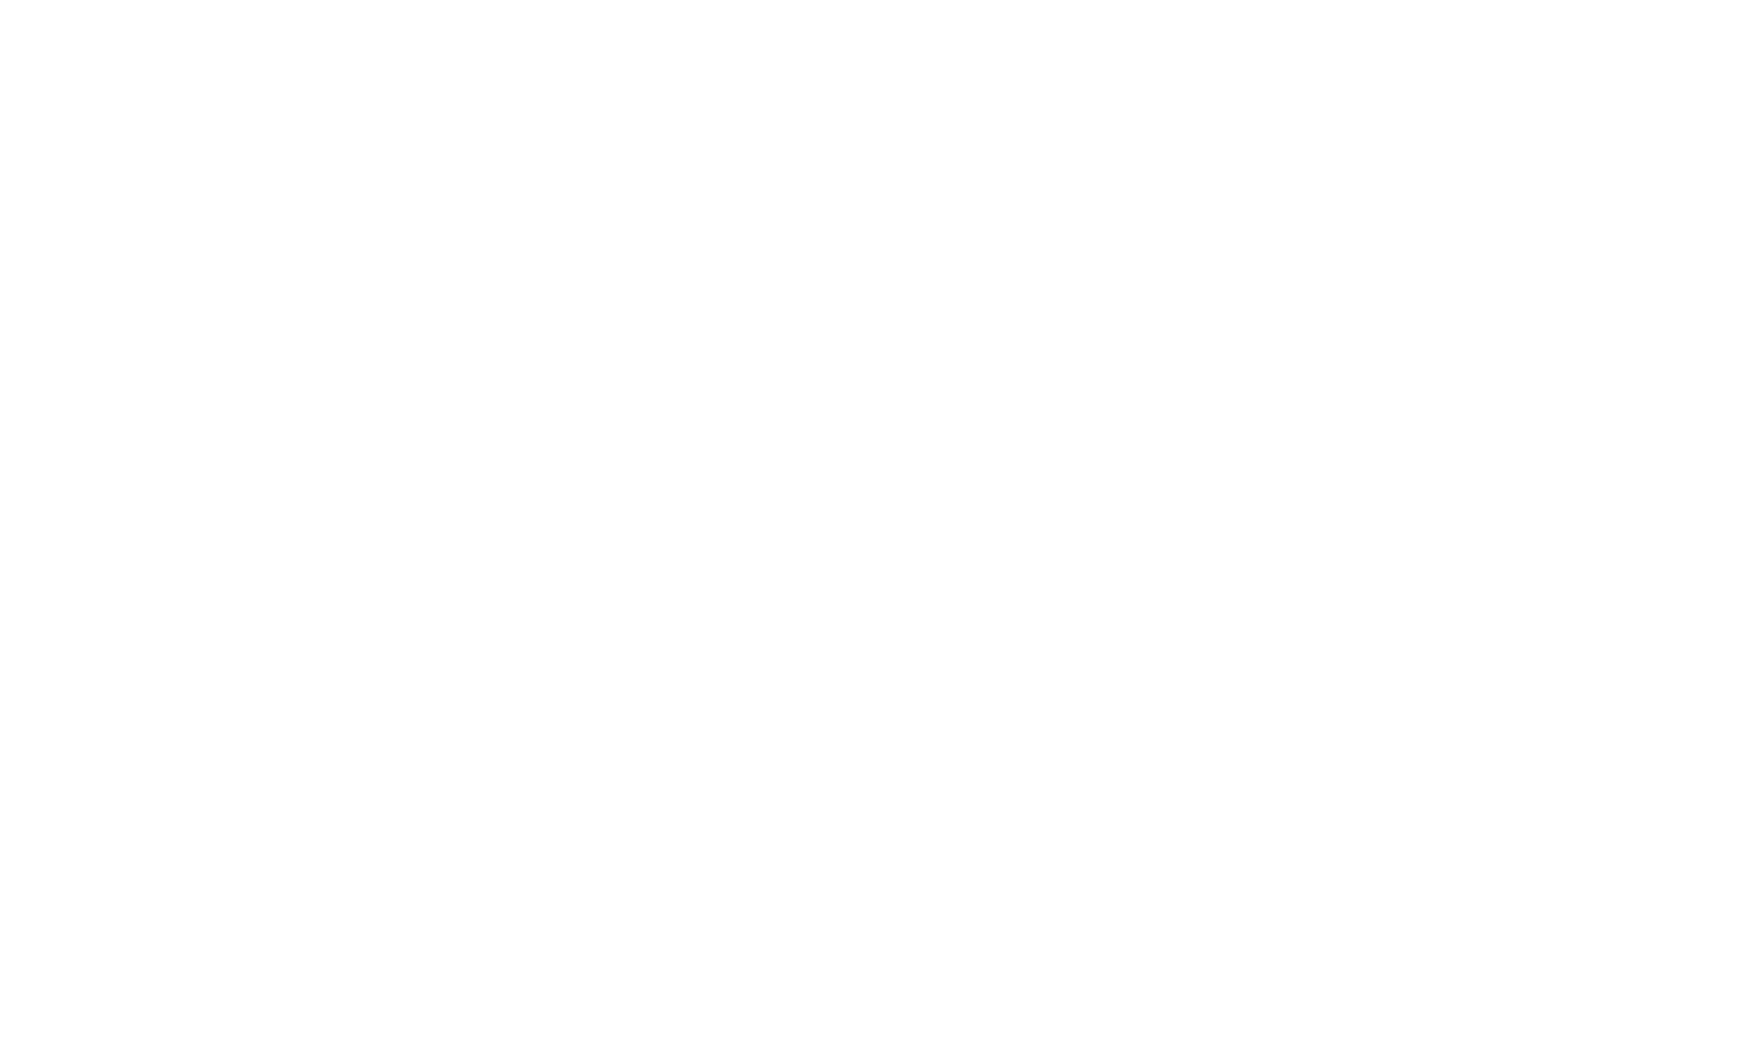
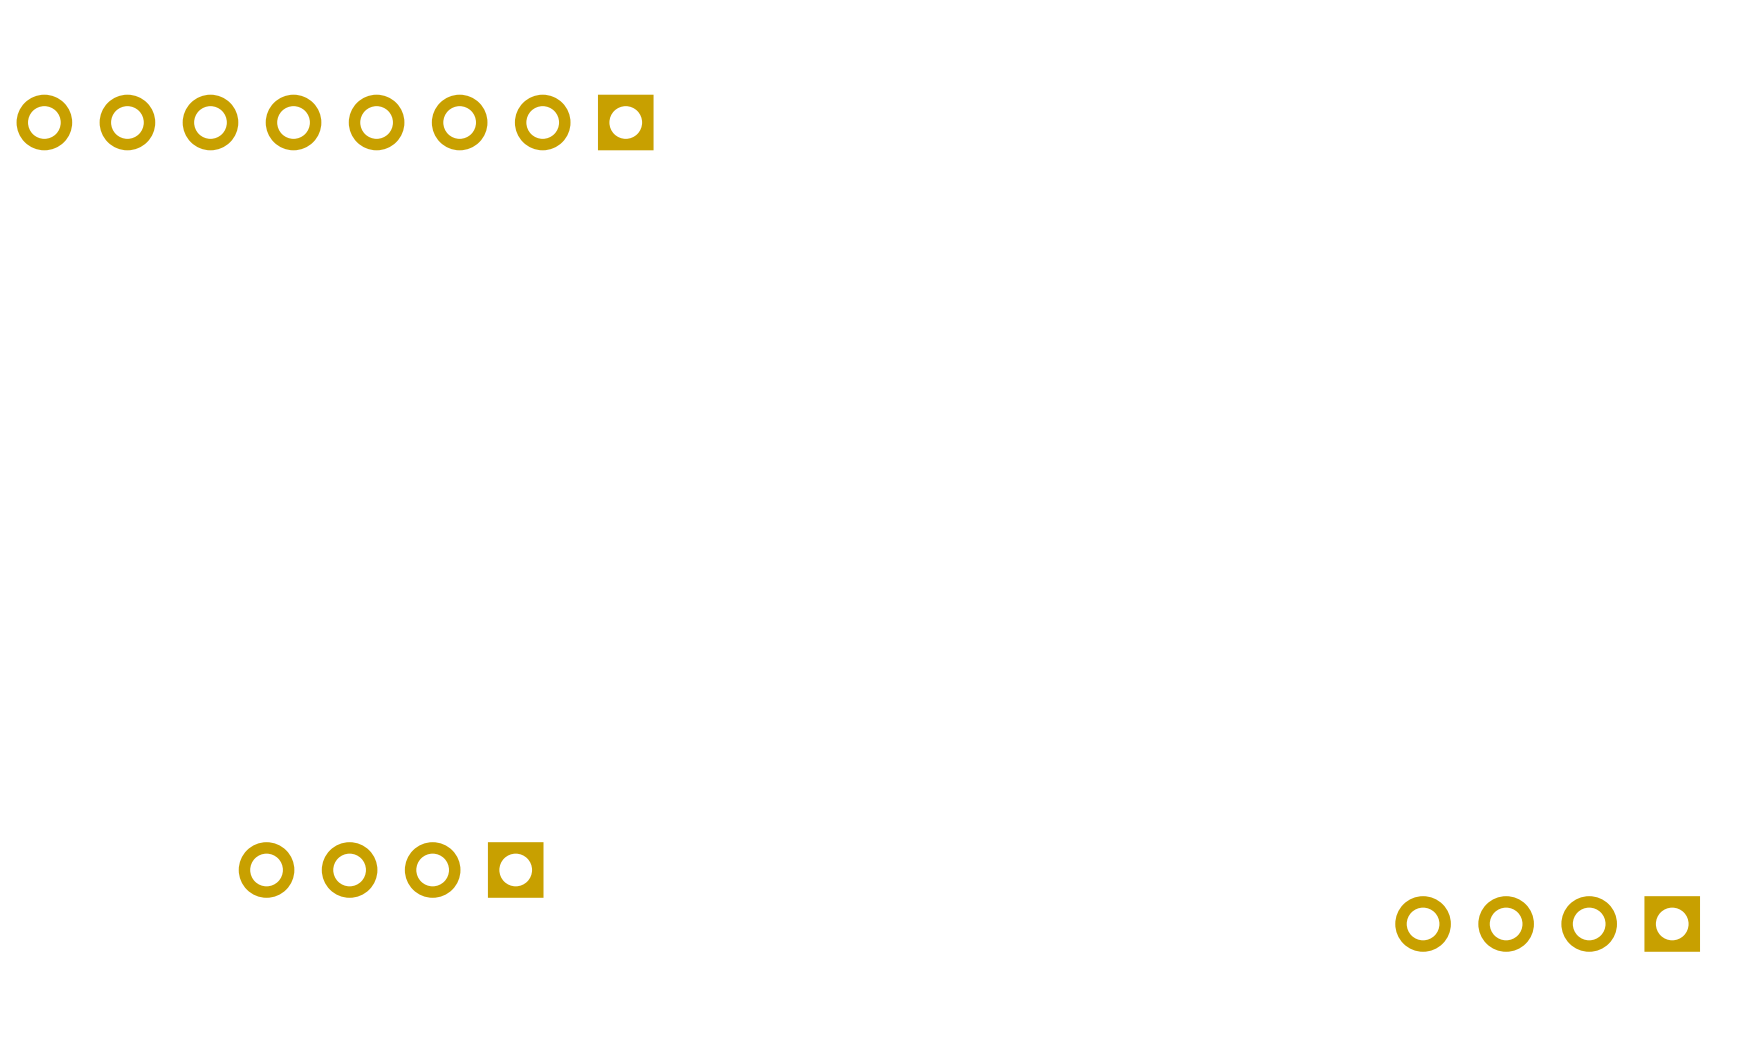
part: none -> (335, 122)
part: none -> (391, 869)
part: none -> (1547, 923)

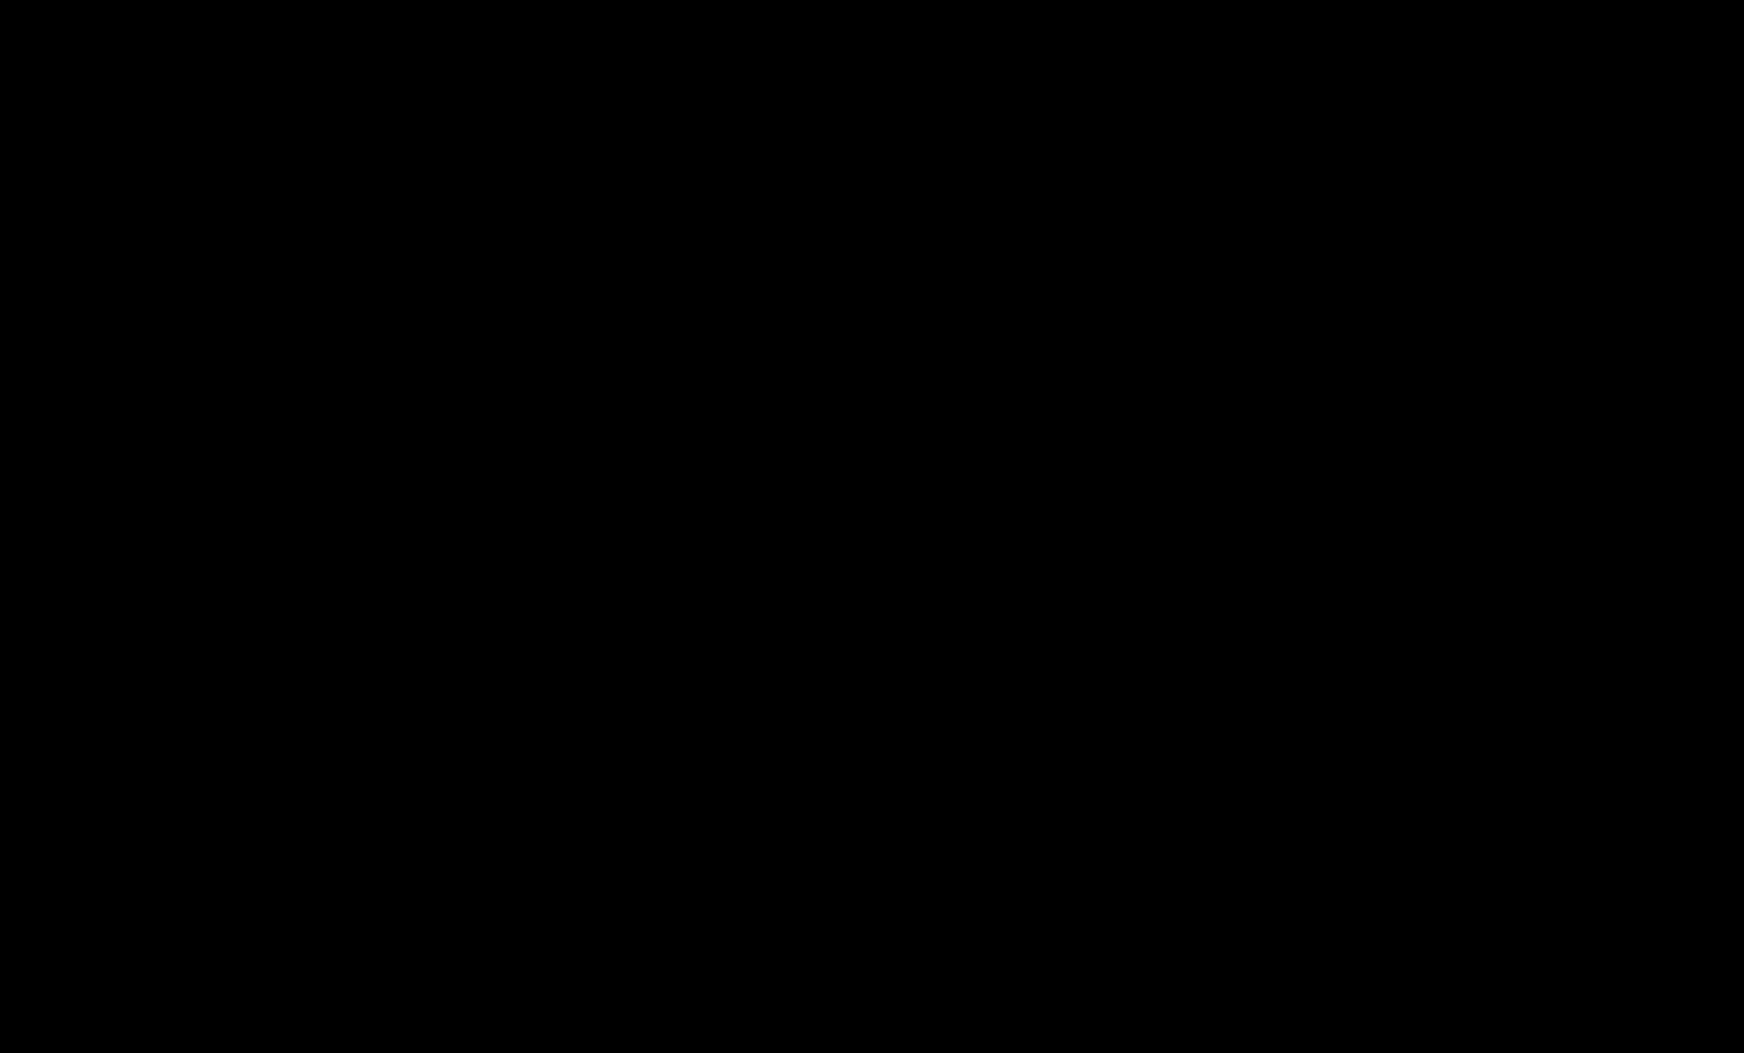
part: (335, 122) -> none
part: (391, 869) -> none
part: (1547, 923) -> none

